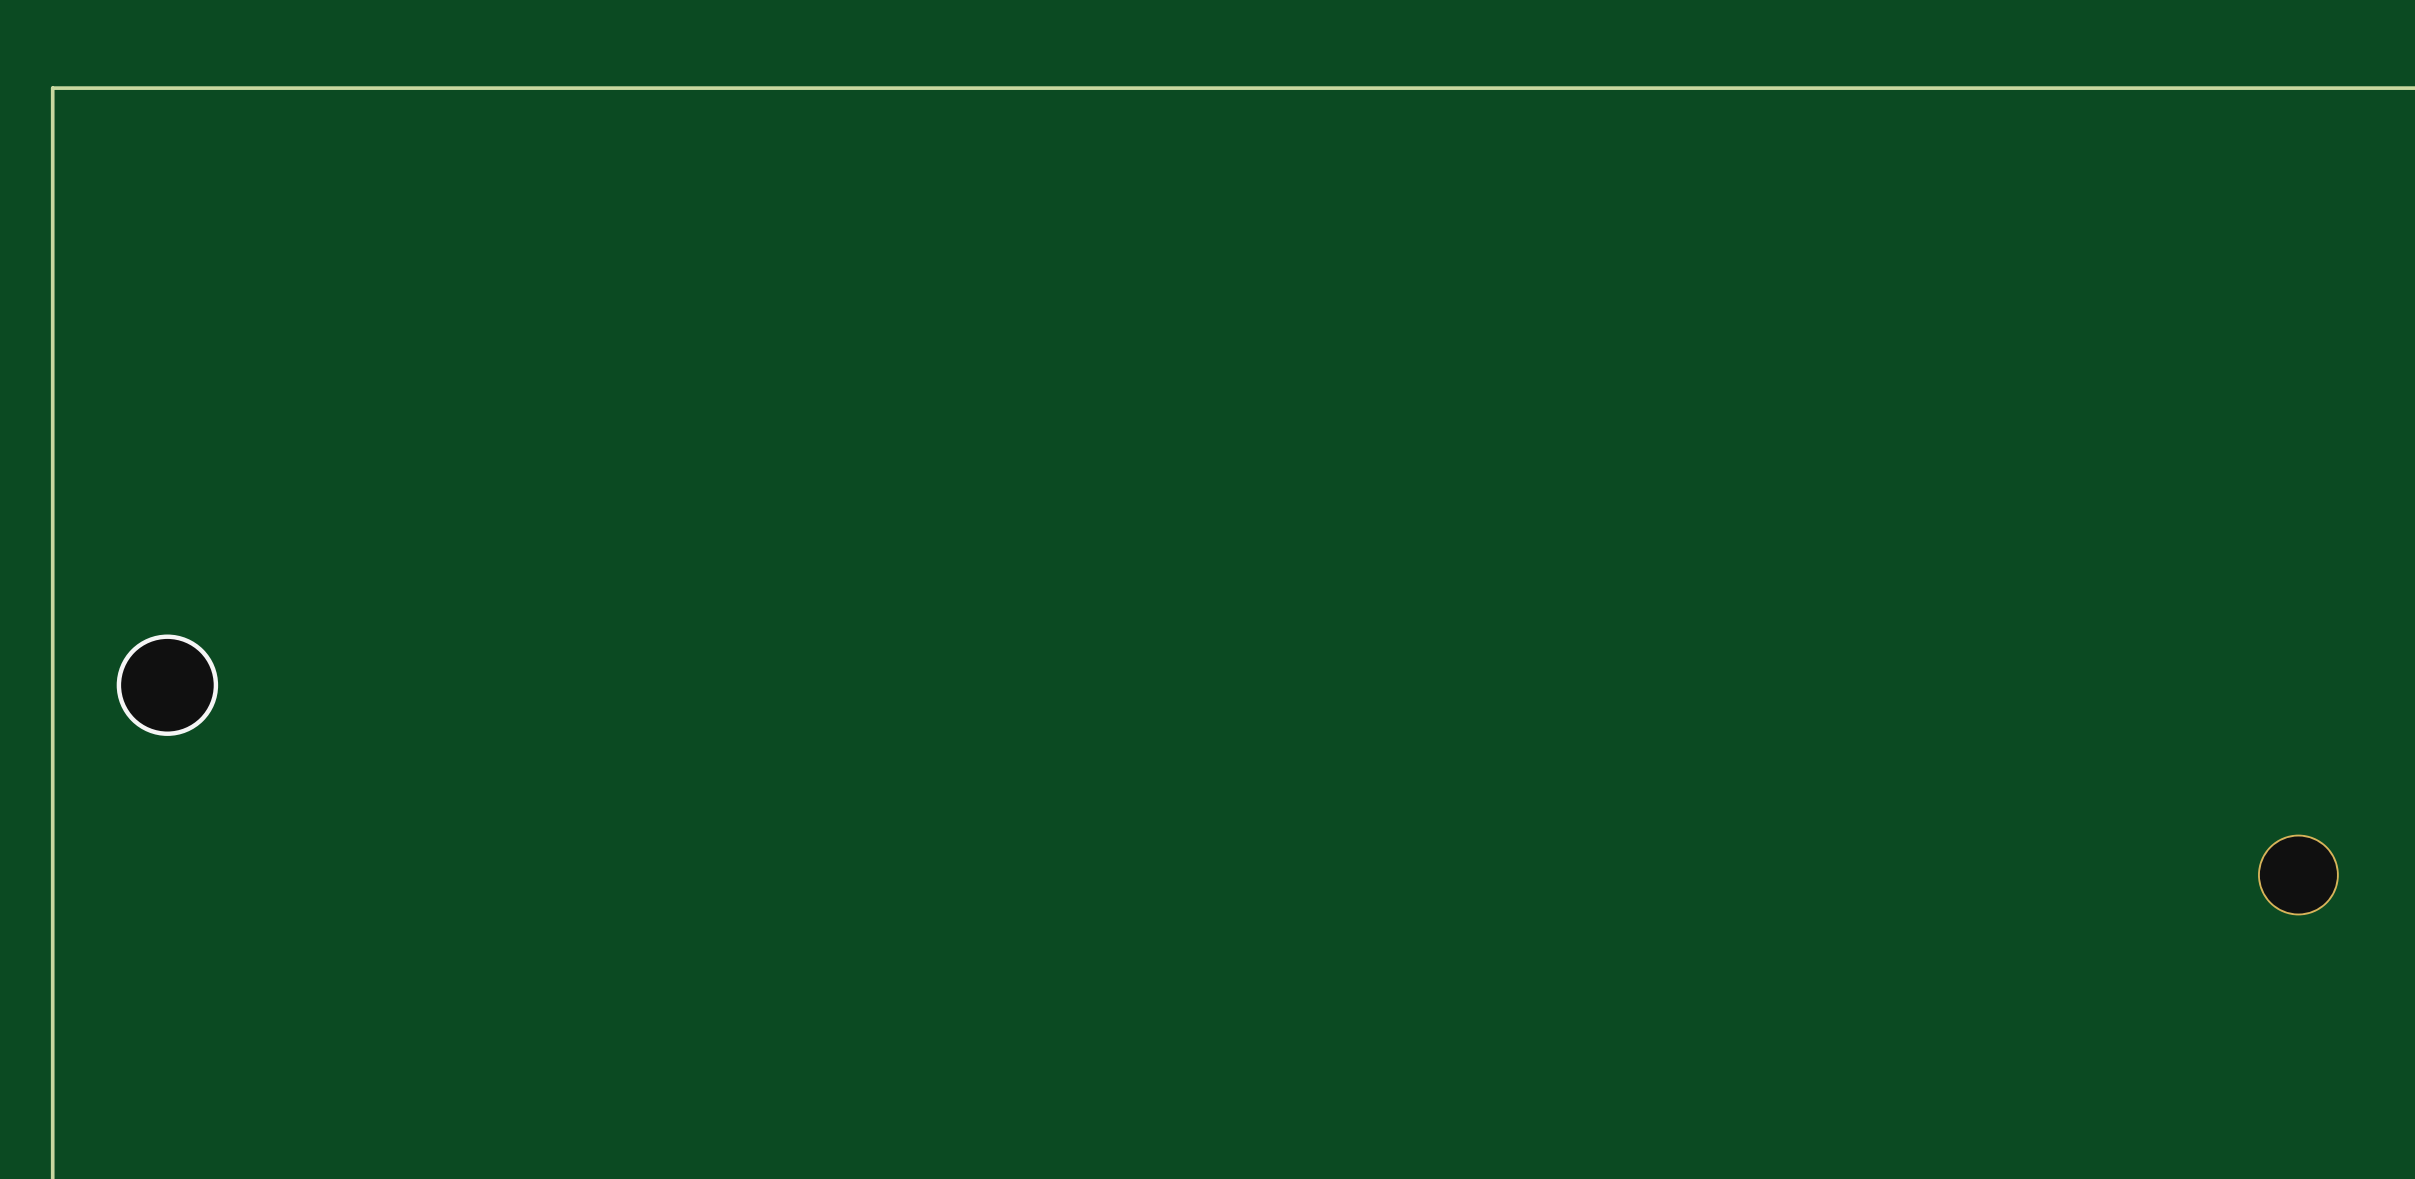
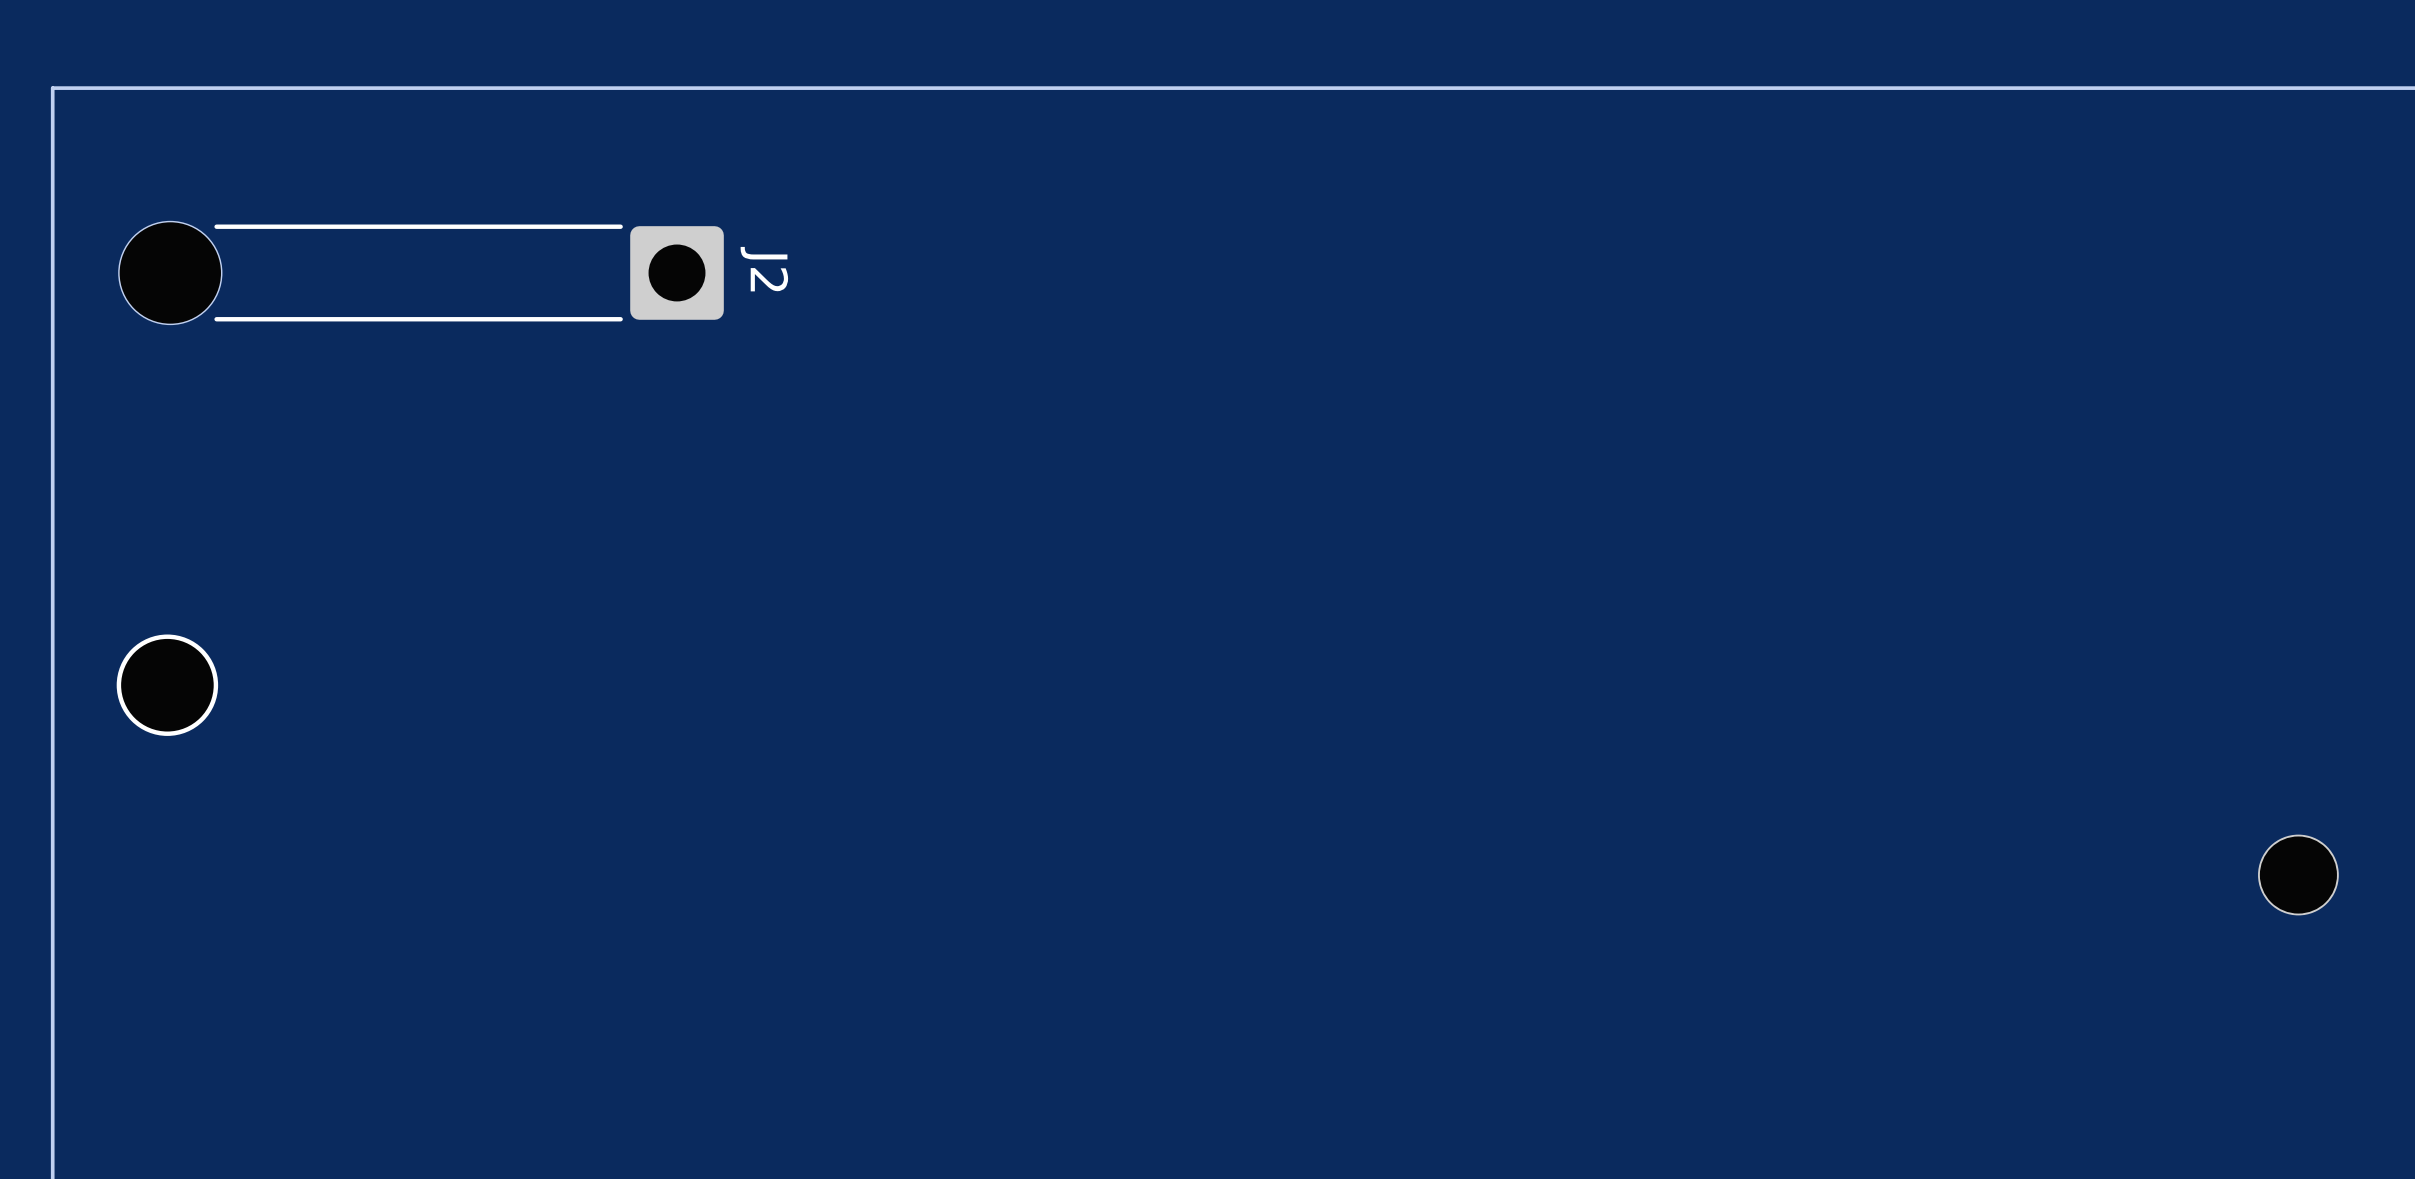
J2: none -> (421, 272)

